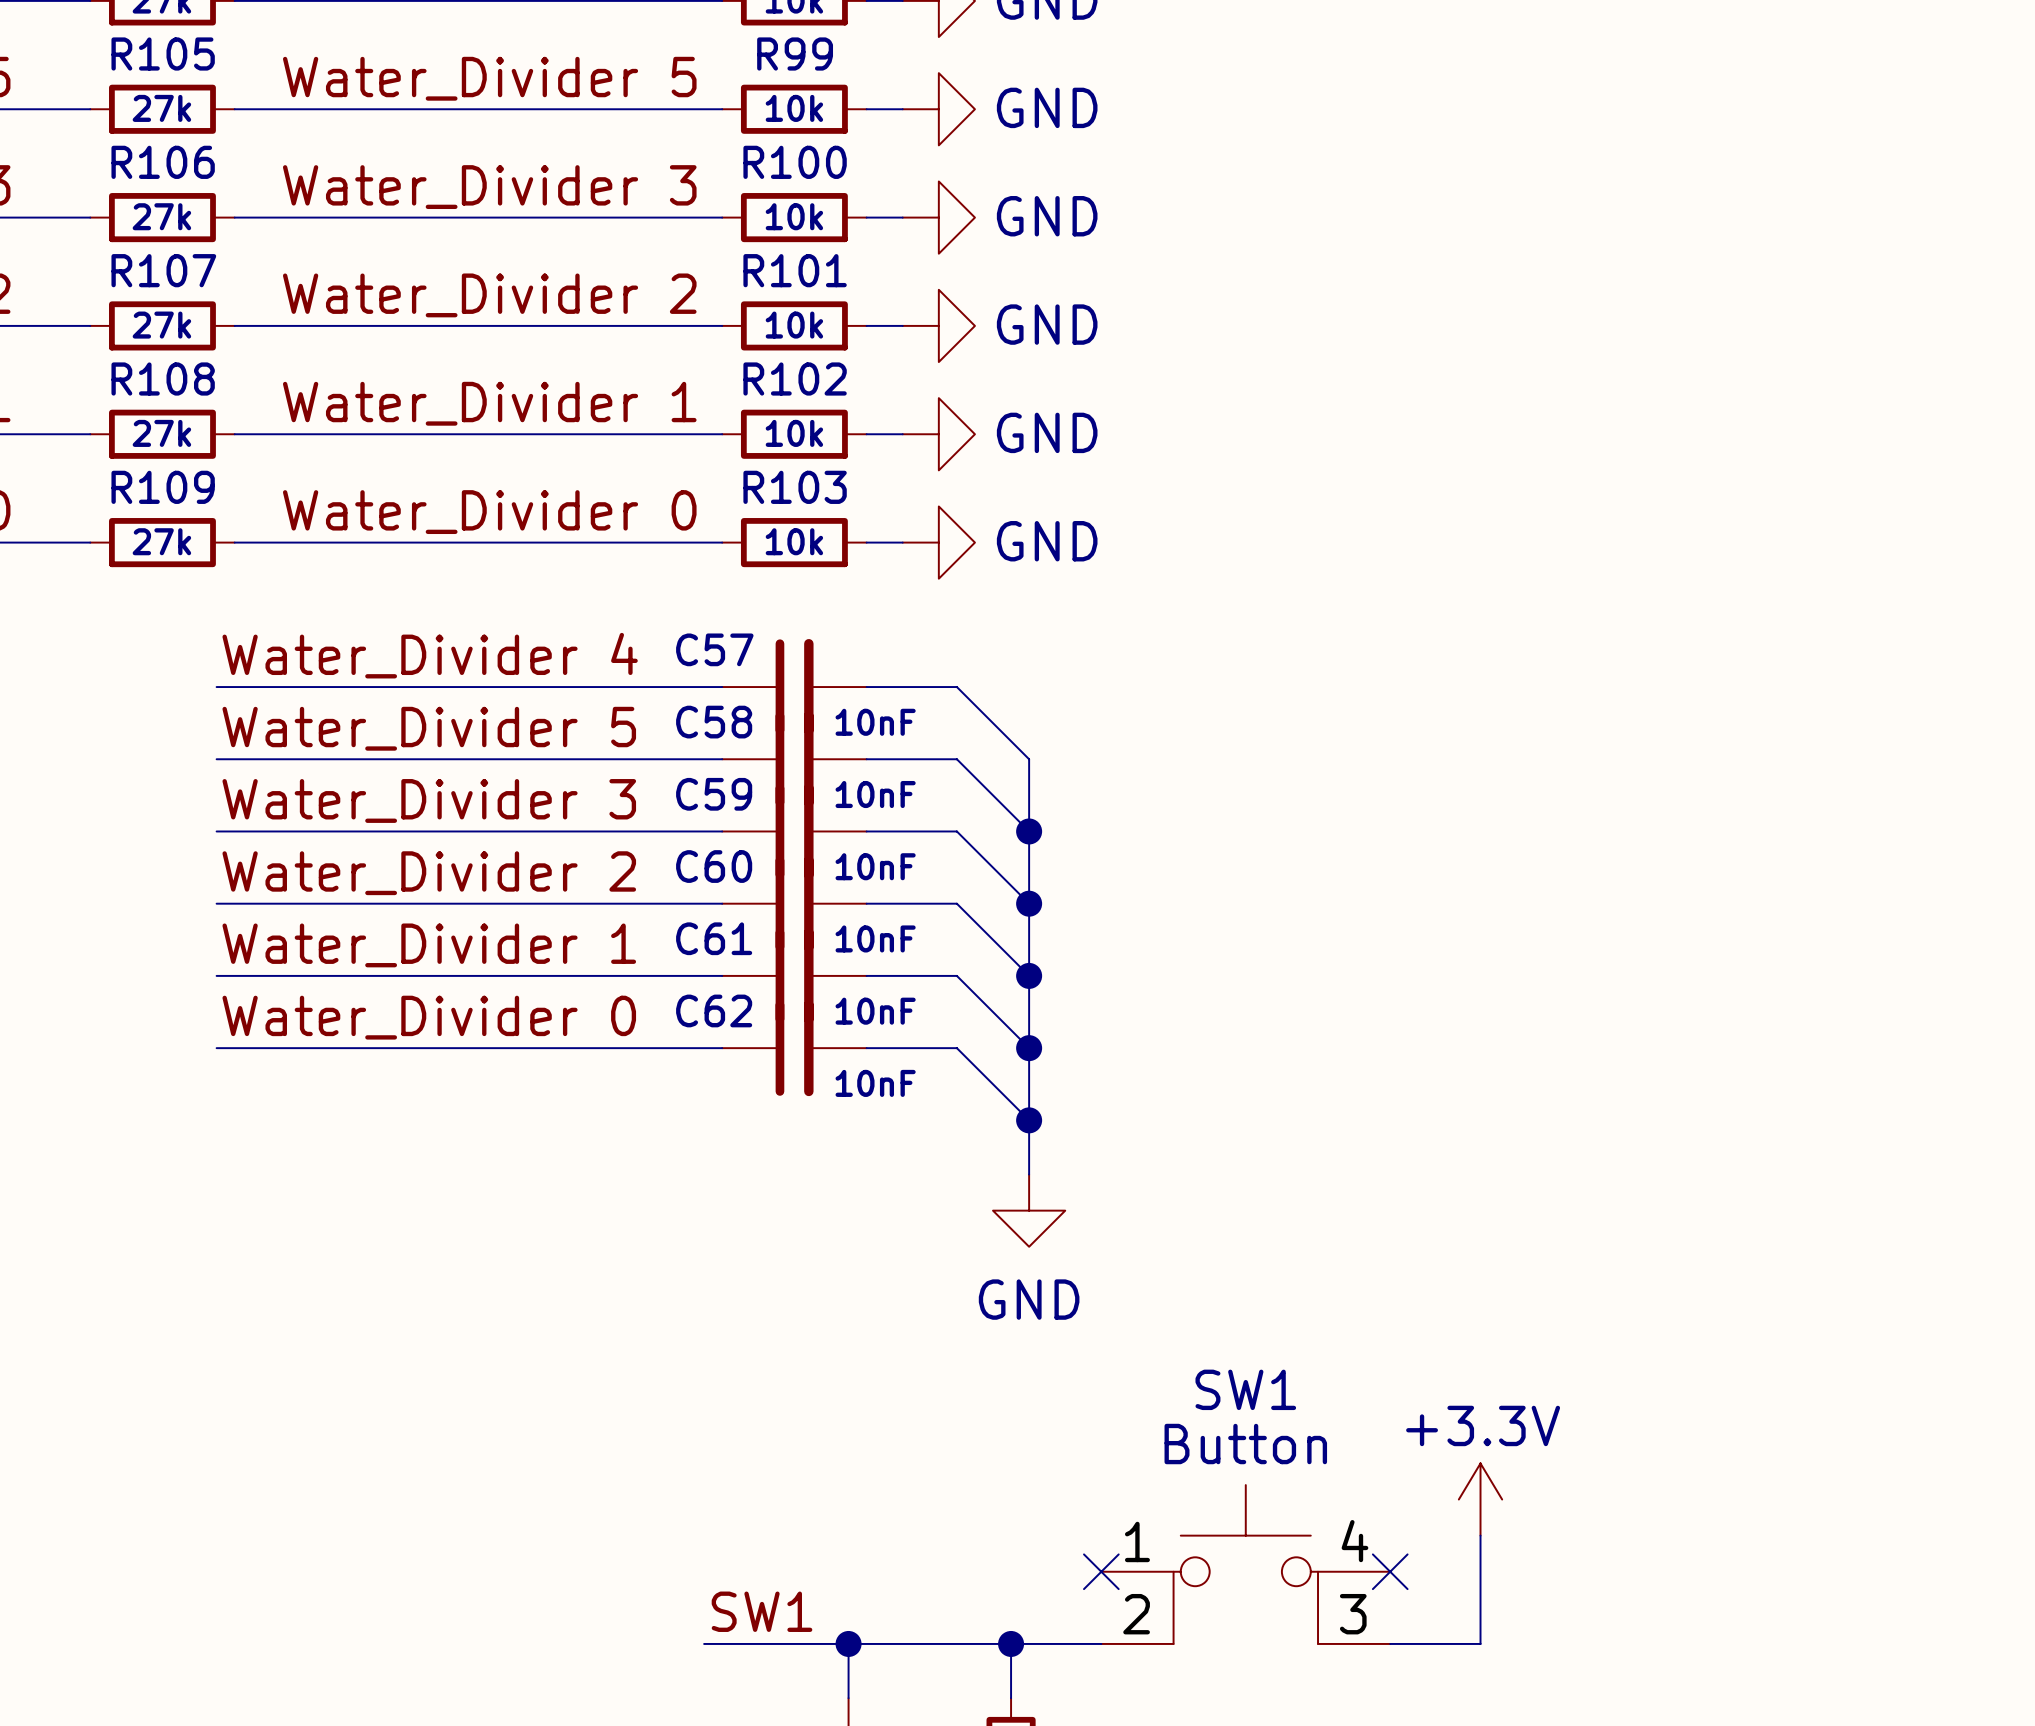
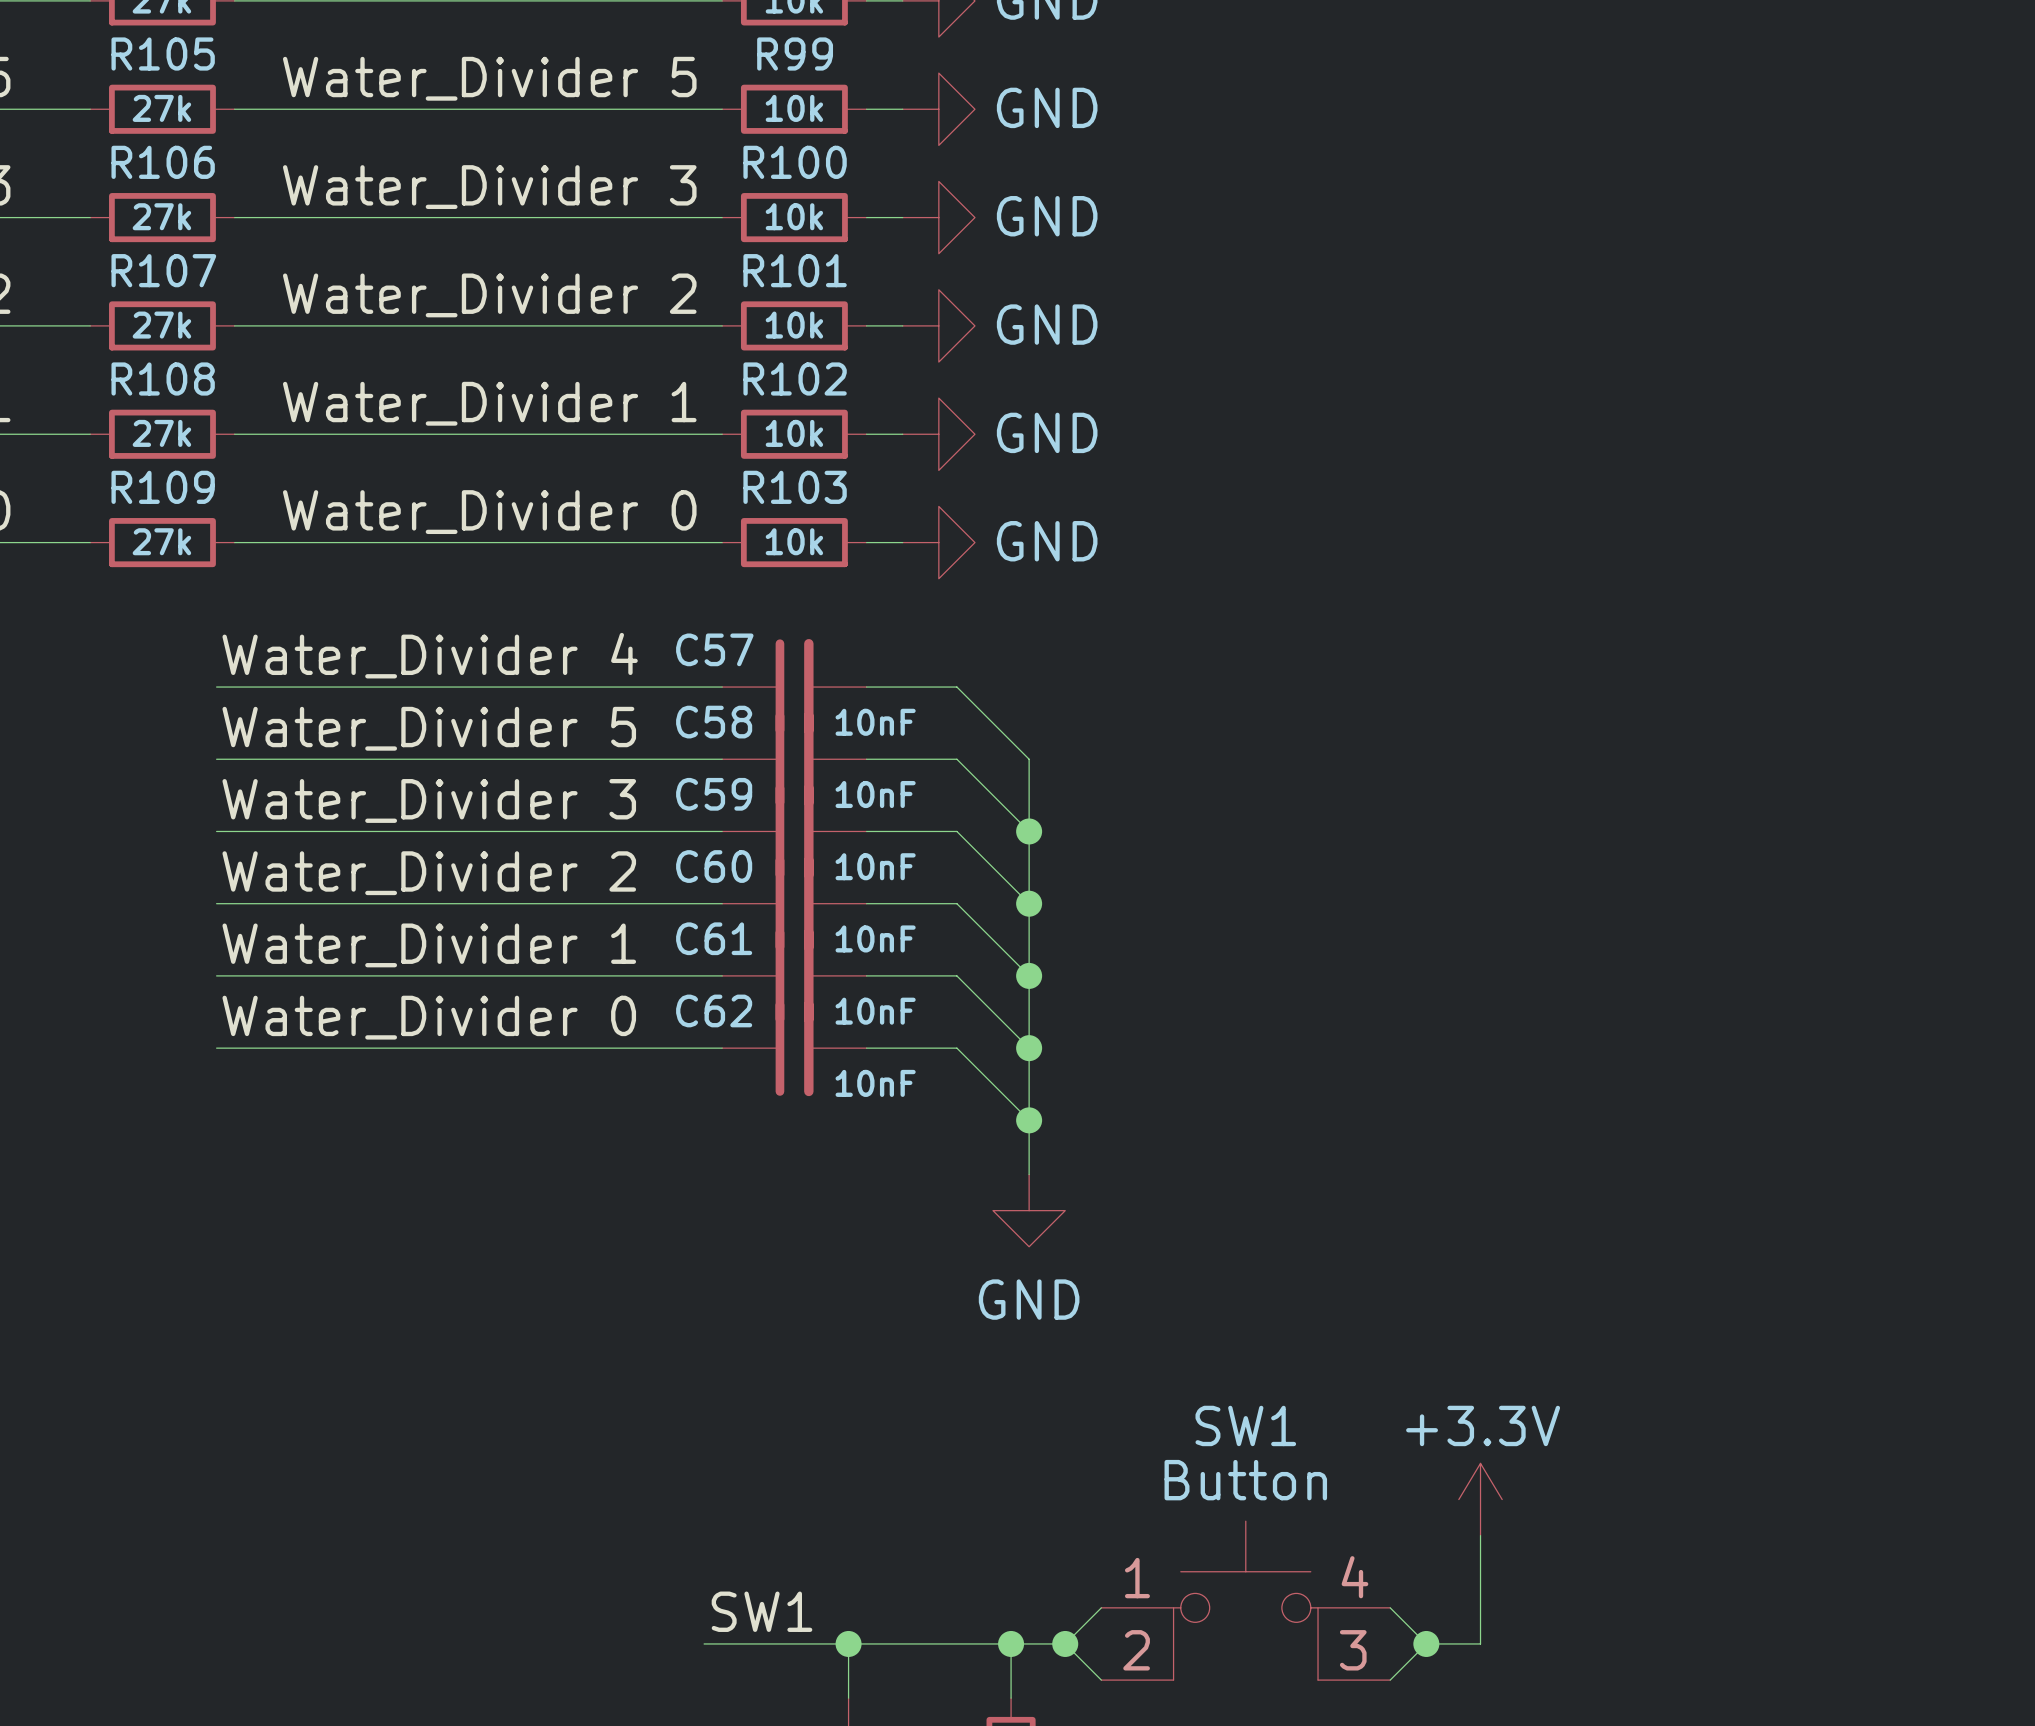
SW1 position: (1245, 1564) -> (1245, 1600)
no-connect mark: (1101, 1571) -> none
no-connect mark: (1390, 1571) -> none
wire: none -> (1101, 1607) (1065, 1643) (1101, 1680)
wire: none -> (1390, 1607) (1426, 1643) (1390, 1680)
wire: (1065, 1643) (1101, 1643) -> none
junction: none -> (1065, 1643)
wire: (1390, 1643) (1426, 1643) -> none
junction: none -> (1426, 1643)

